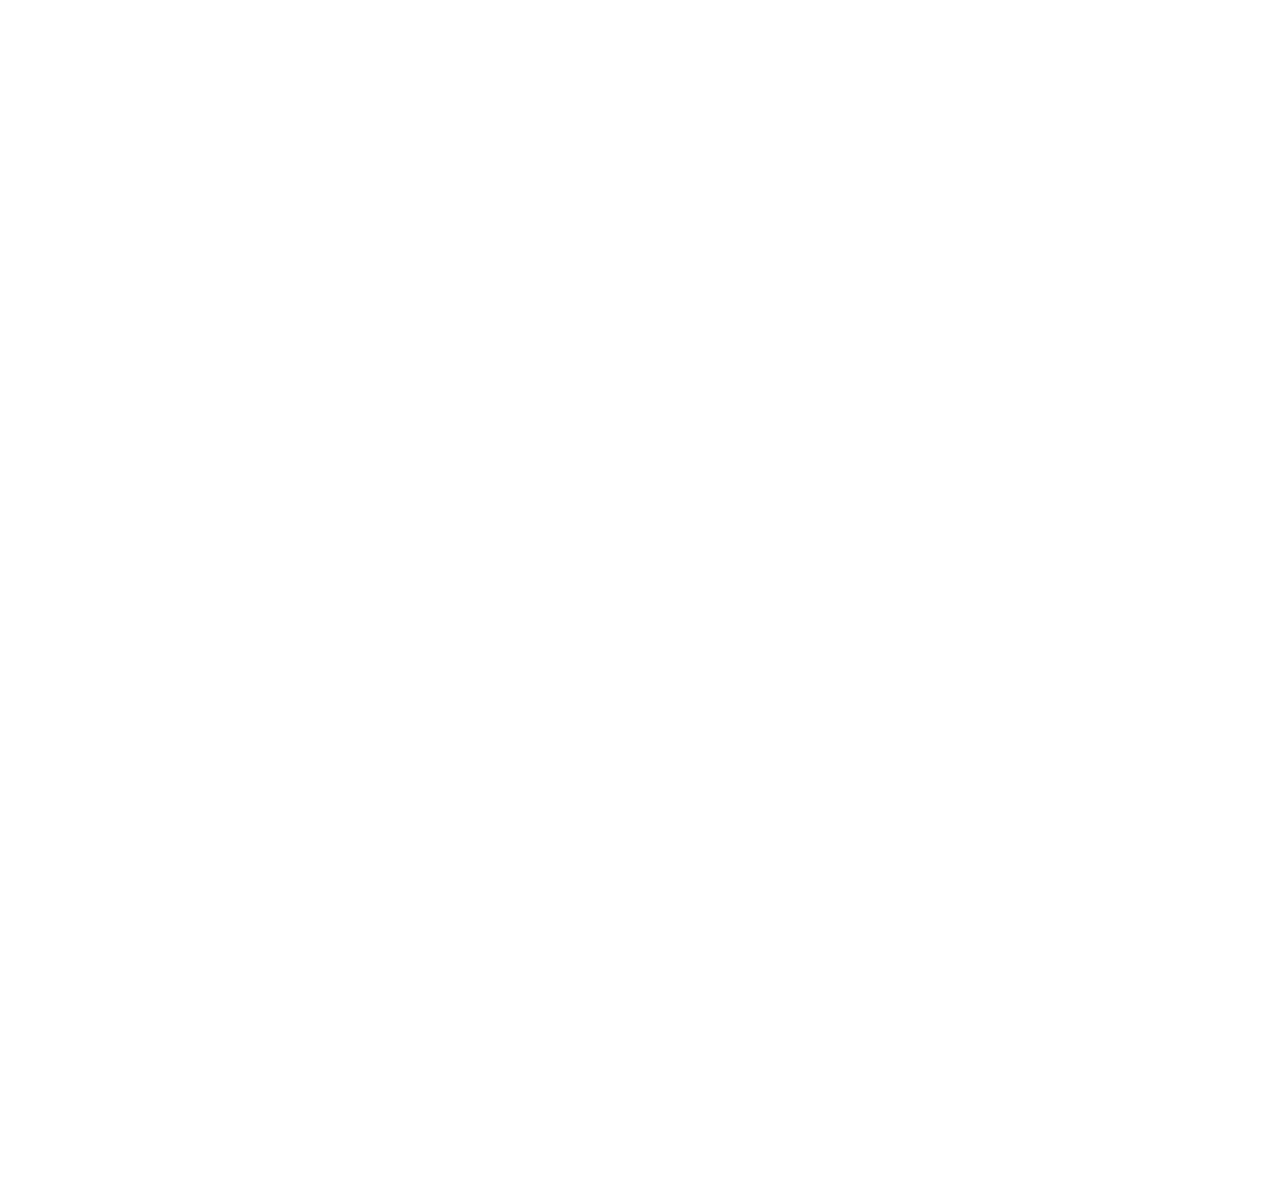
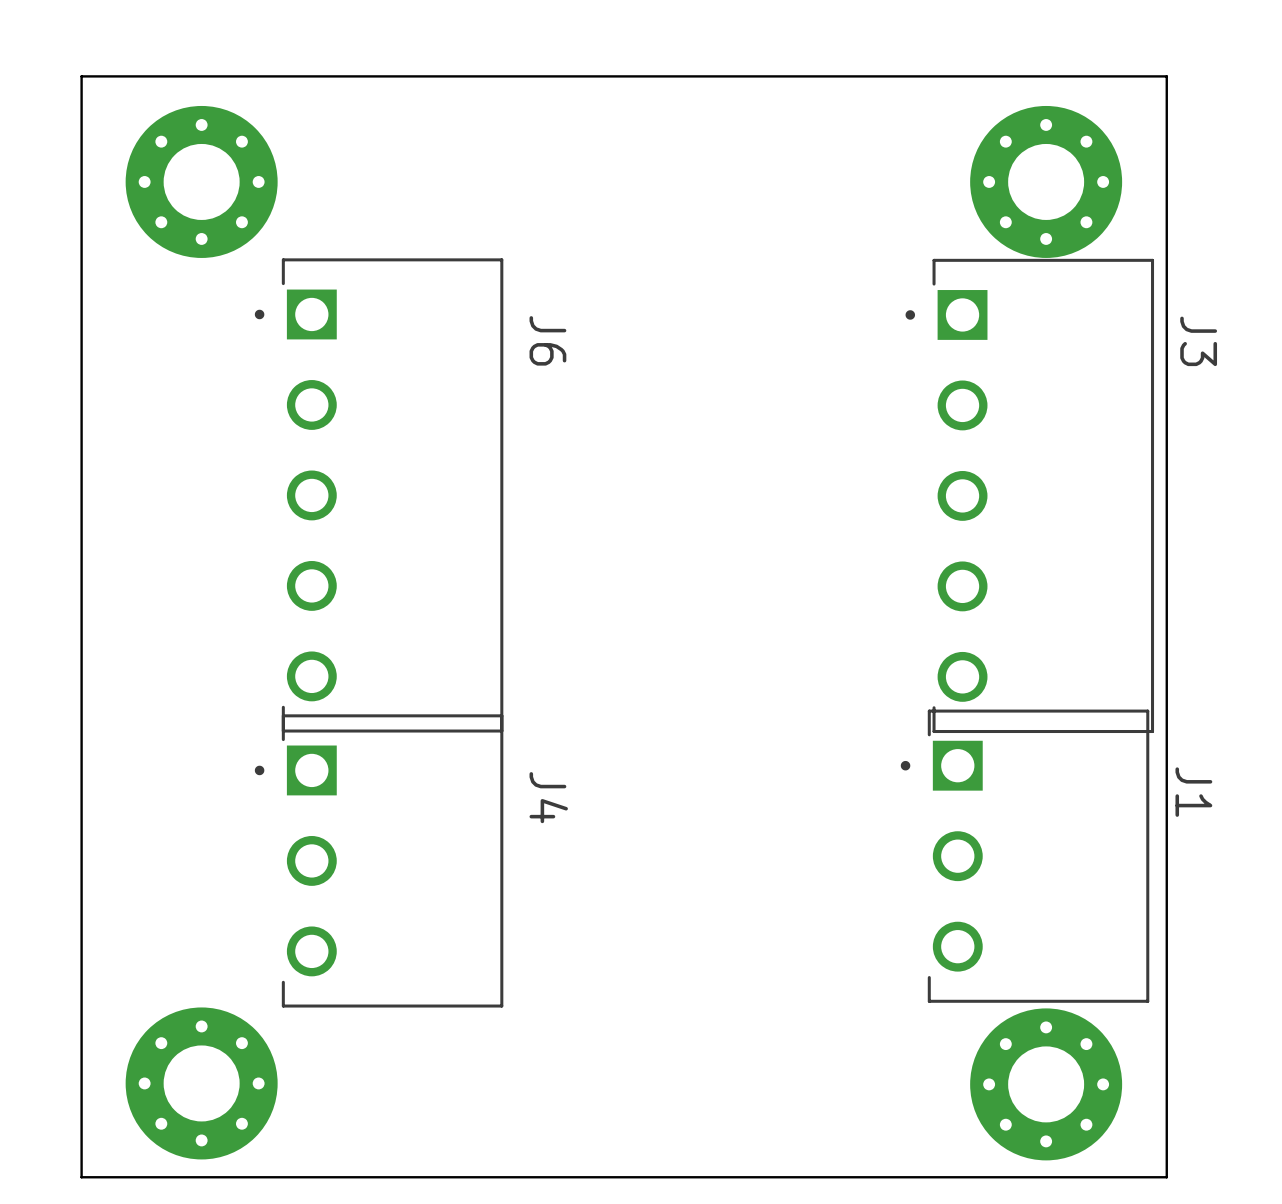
board edge: none -> (1166, 76) (81, 76) (81, 1177) (1166, 1177) (1166, 76)
part: none -> (201, 181)
part: none -> (1046, 181)
J6: none -> (379, 495)
J3: none -> (1029, 495)
J1: none -> (1025, 856)
J4: none -> (379, 860)
part: none -> (201, 1083)
part: none -> (1046, 1084)

